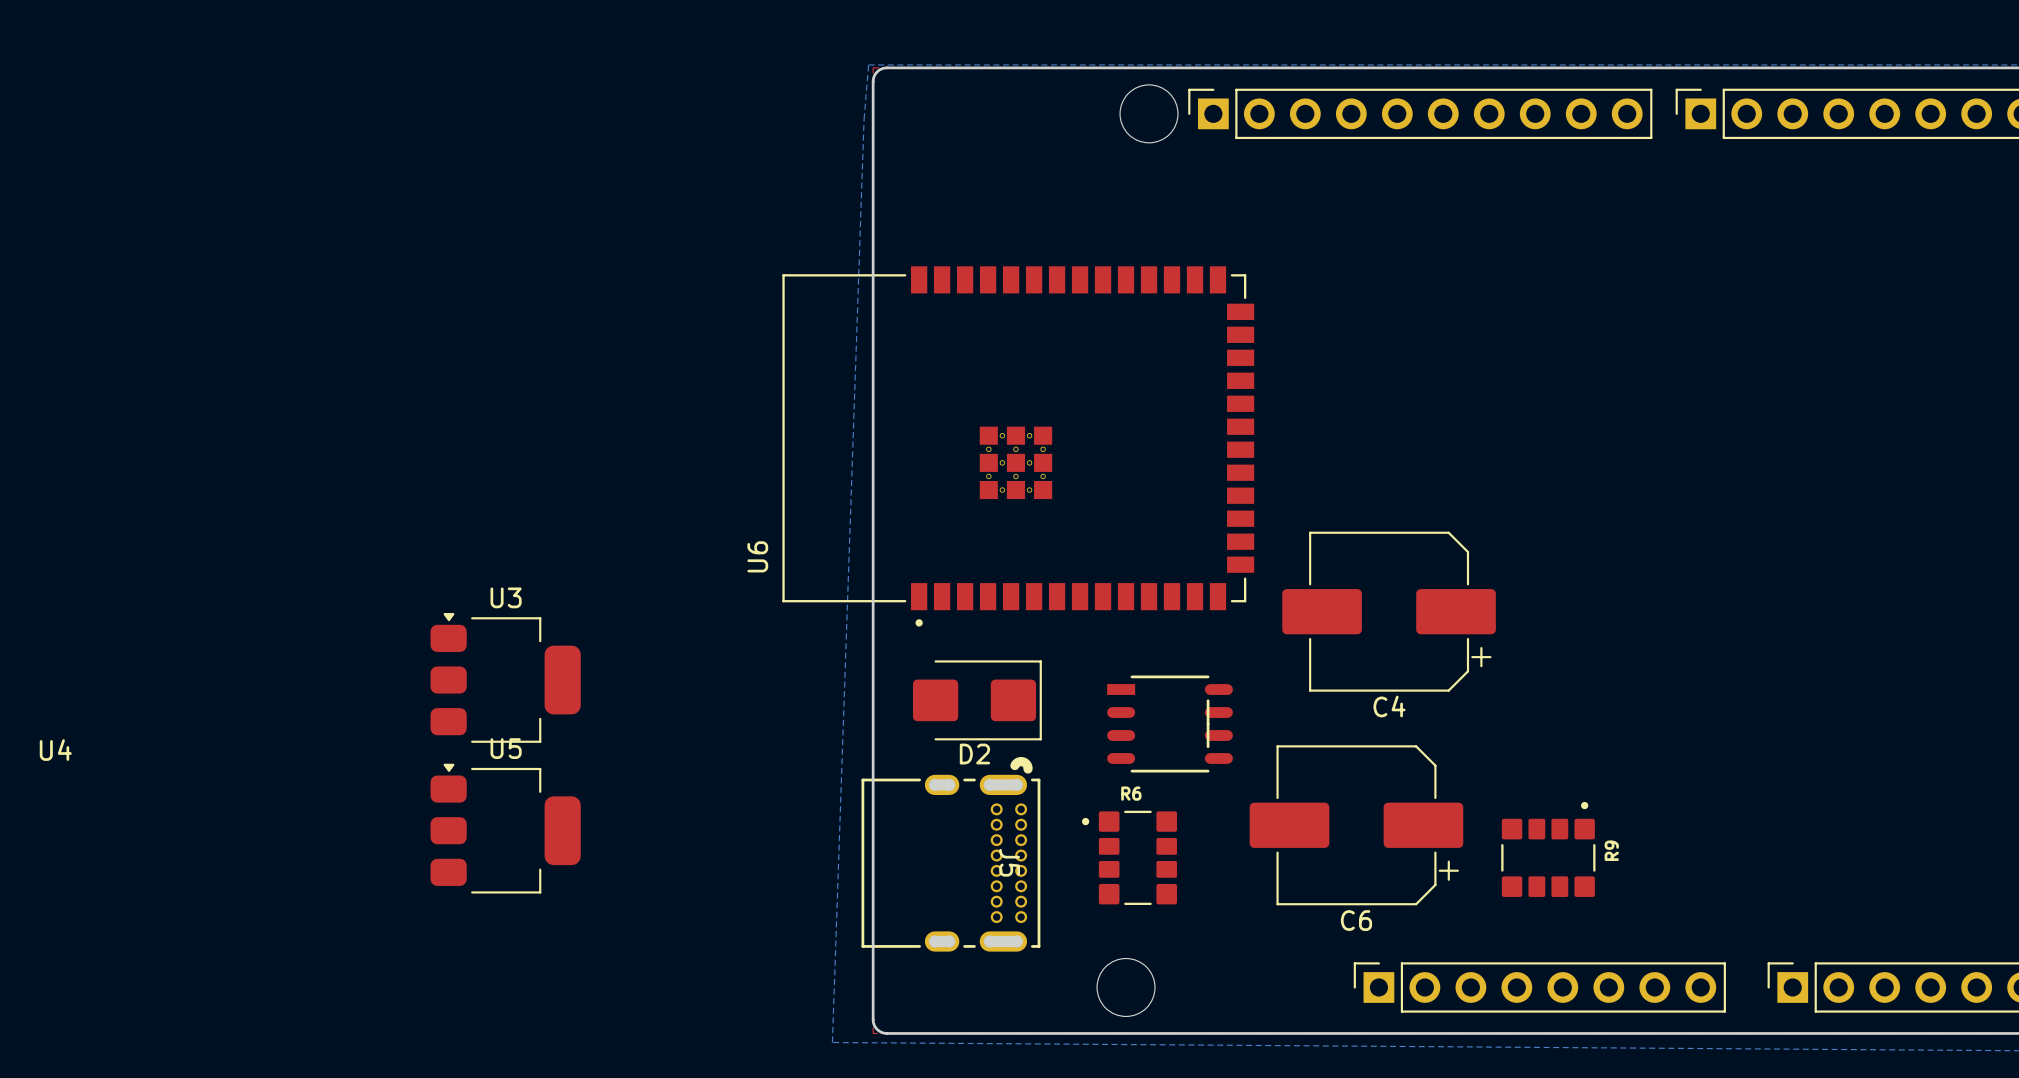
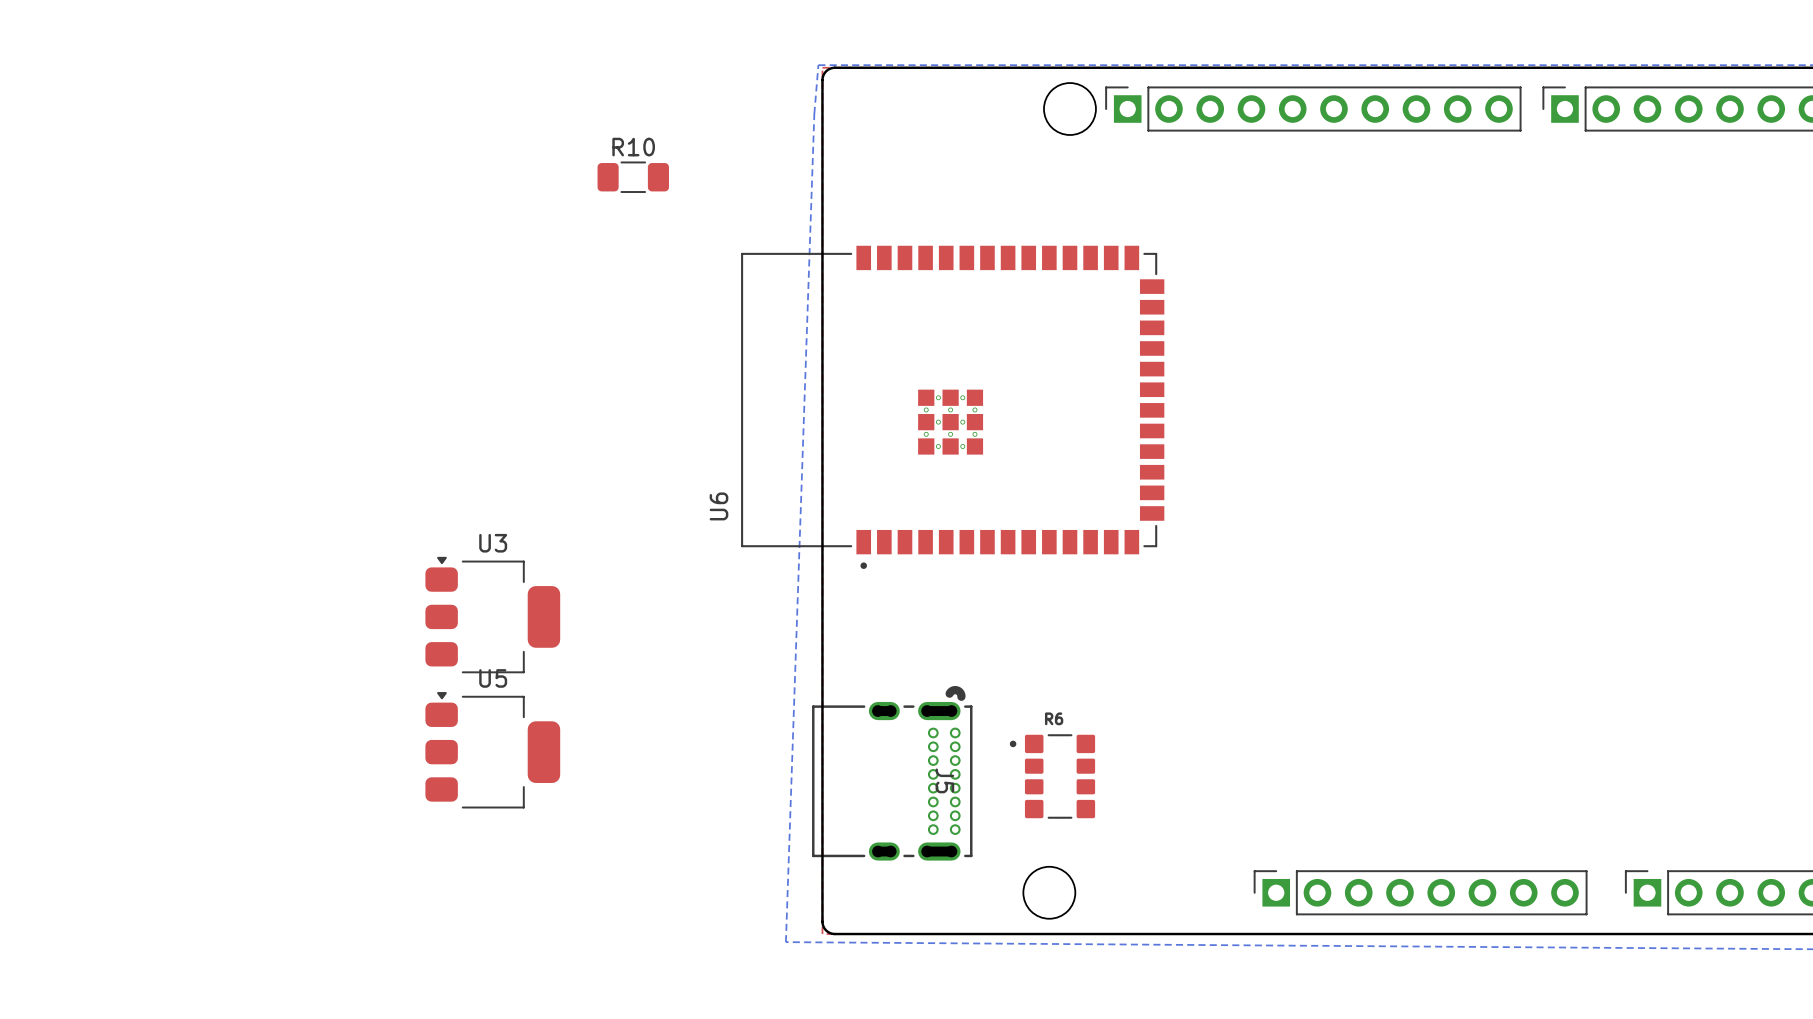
R10: none -> (633, 177)
C4: (1389, 611) -> none
D2: (977, 700) -> none
U4: (1170, 724) -> none
C6: (1356, 825) -> none
R9: (1548, 849) -> none

